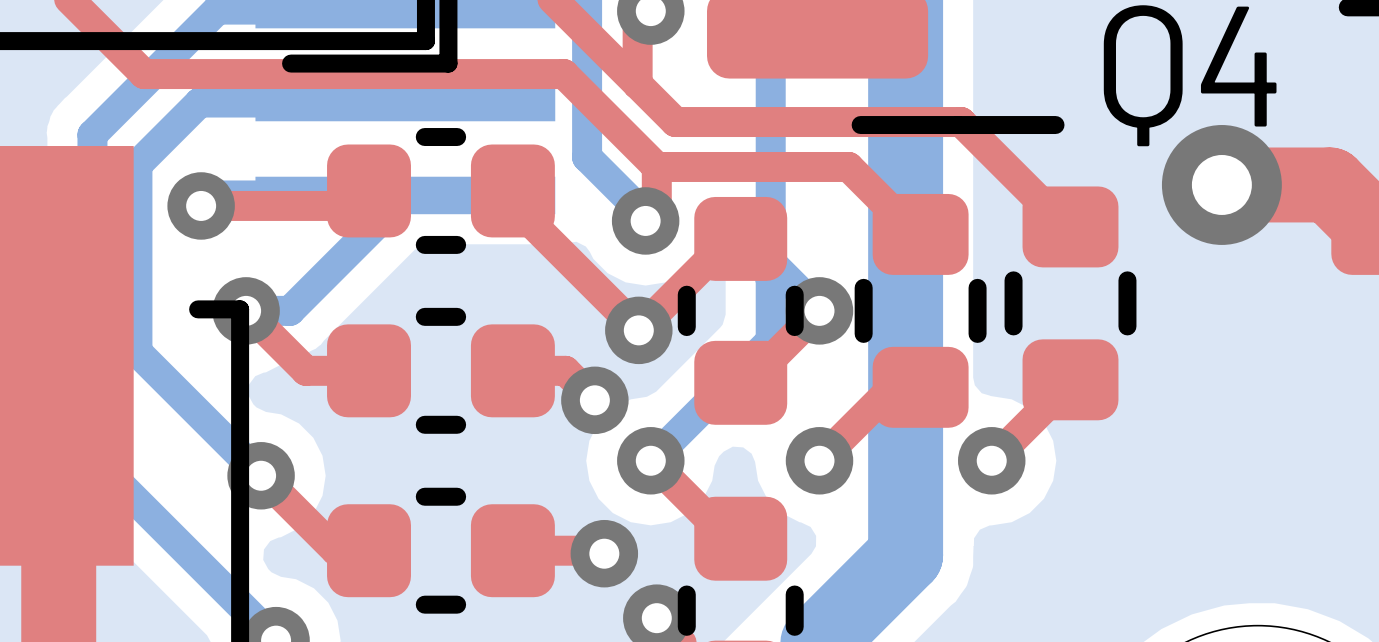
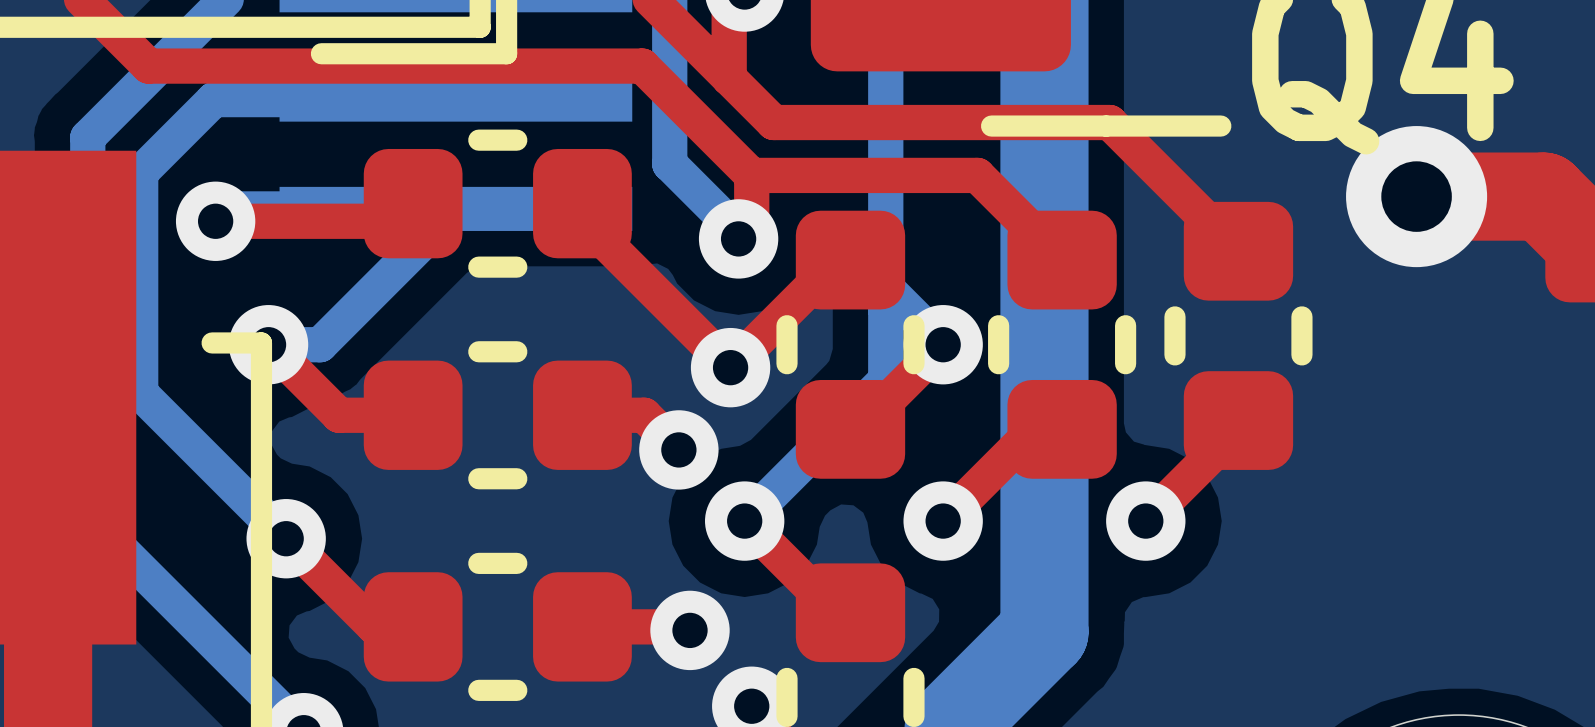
part footprint: [1004, 186, 1137, 421] -> [1164, 201, 1313, 470]
part footprint: [854, 193, 987, 428] -> [988, 210, 1137, 479]

